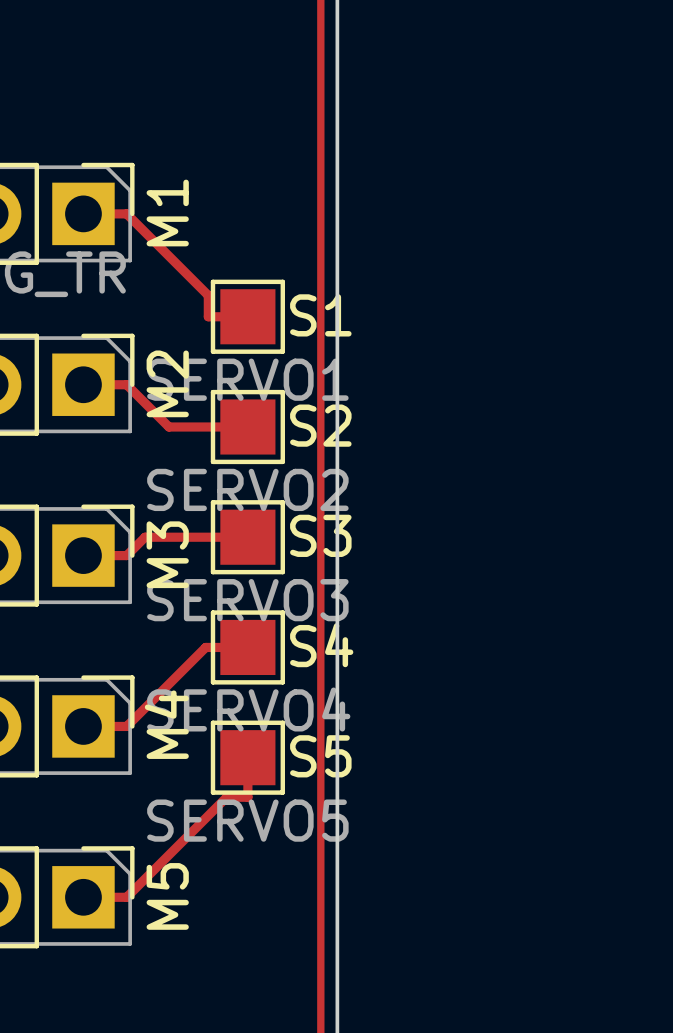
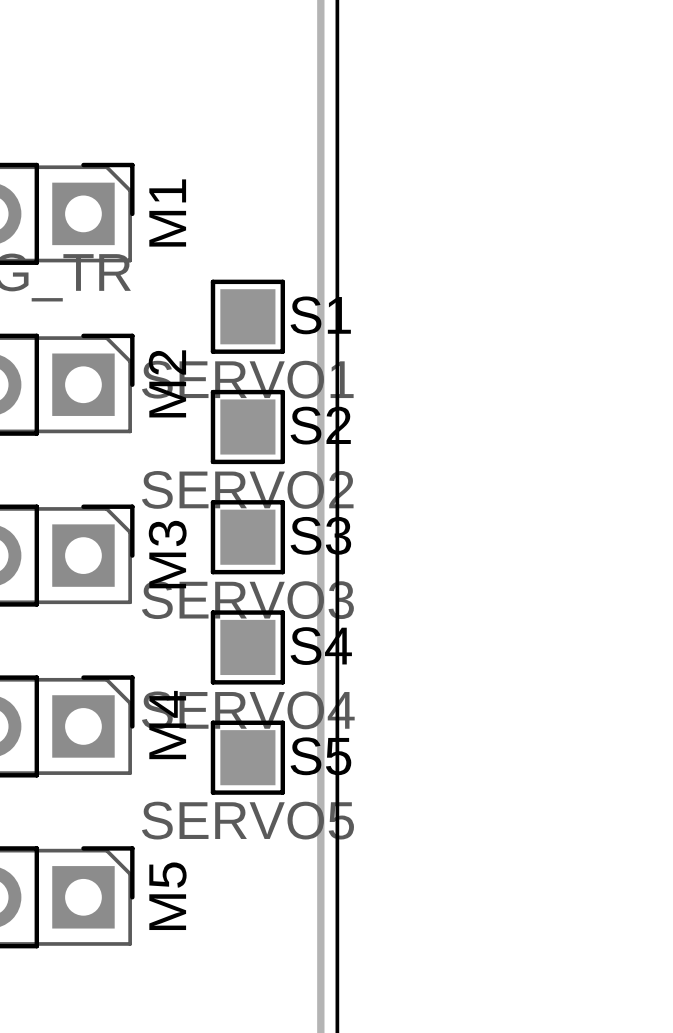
track: (83, 213) (126, 213) (208, 295) (208, 316) (247, 316) -> none
track: (83, 384) (126, 384) (168, 426) (247, 426) -> none
track: (247, 537) (145, 537) (126, 555) (83, 555) -> none
track: (247, 647) (205, 647) (126, 726) (83, 726) -> none
track: (247, 757) (247, 797) (226, 797) (126, 897) (83, 897) -> none

